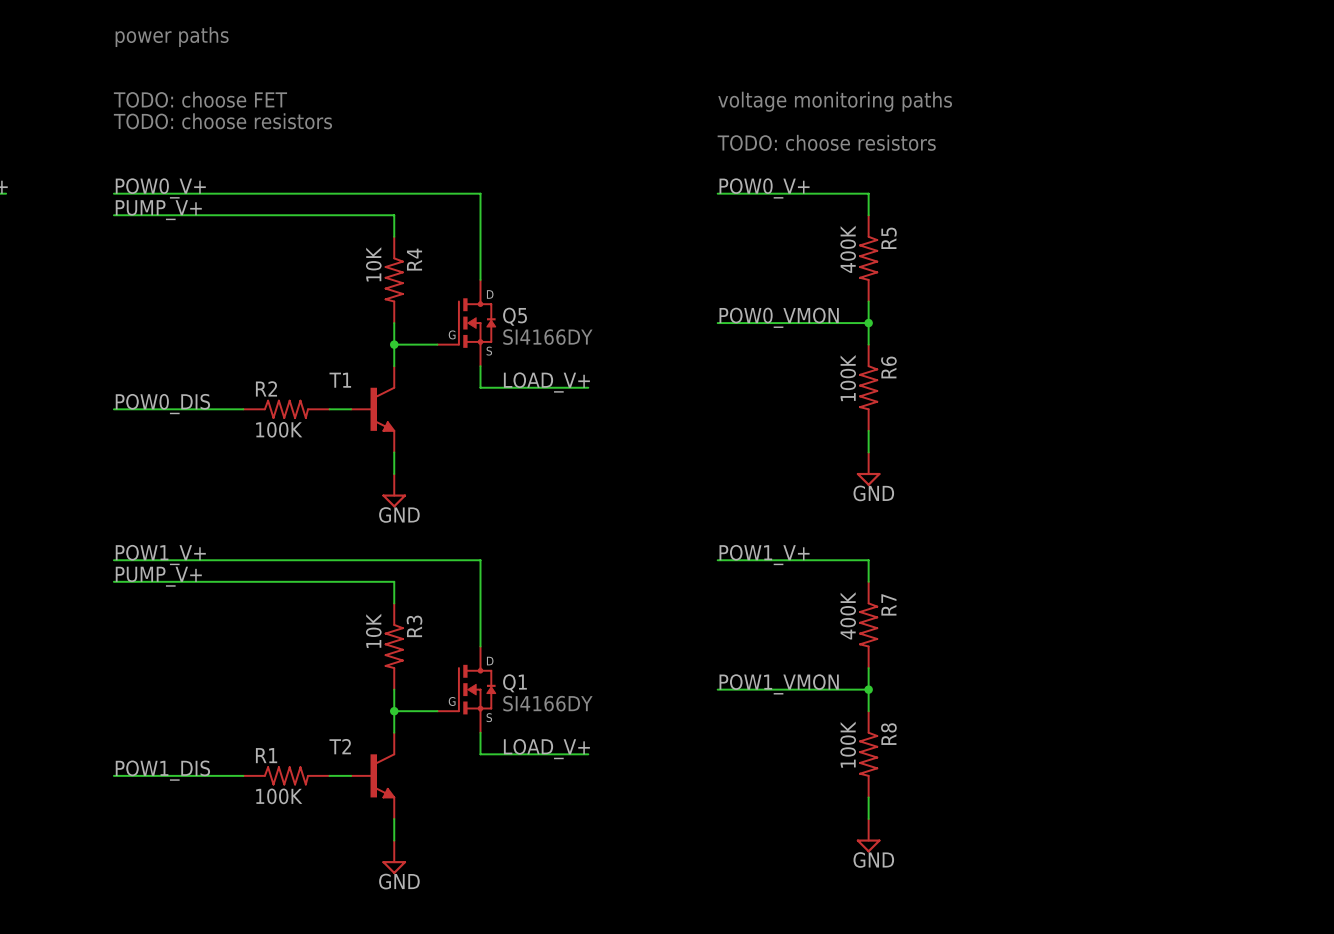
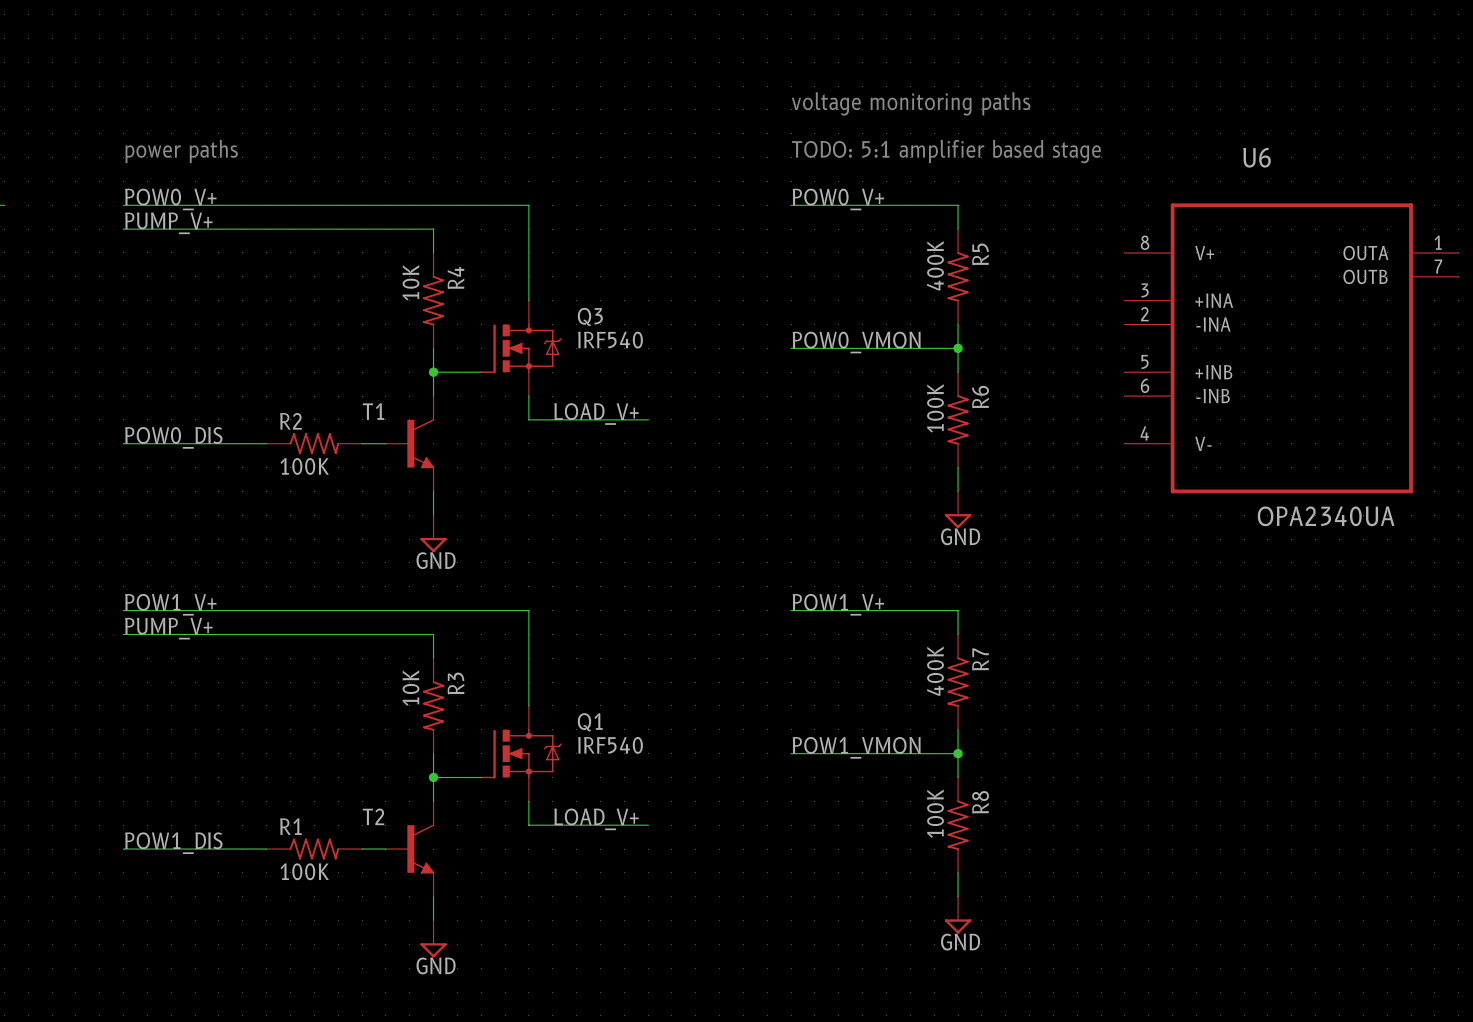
text position: power paths (172, 37) -> power paths (181, 151)
text: TODO: choose FET (200, 99) -> none
text: TODO: choose resistors (222, 121) -> none
text: TODO: choose resistors (826, 142) -> TODO: 5:1 amplifier based stage (946, 151)
Q5: (466, 323) -> none
Q3: none -> IRF540 (521, 348)
U6: none -> OPA2340UA (1291, 348)
text: SI4166DY (547, 337) -> none
Q1 symbol: [437, 646, 497, 733] -> [480, 705, 562, 802]
Q1 value: none -> IRF540 (610, 745)
Q1 name position: Q1 (514, 683) -> Q1 (590, 722)
text: SI4166DY (547, 703) -> none

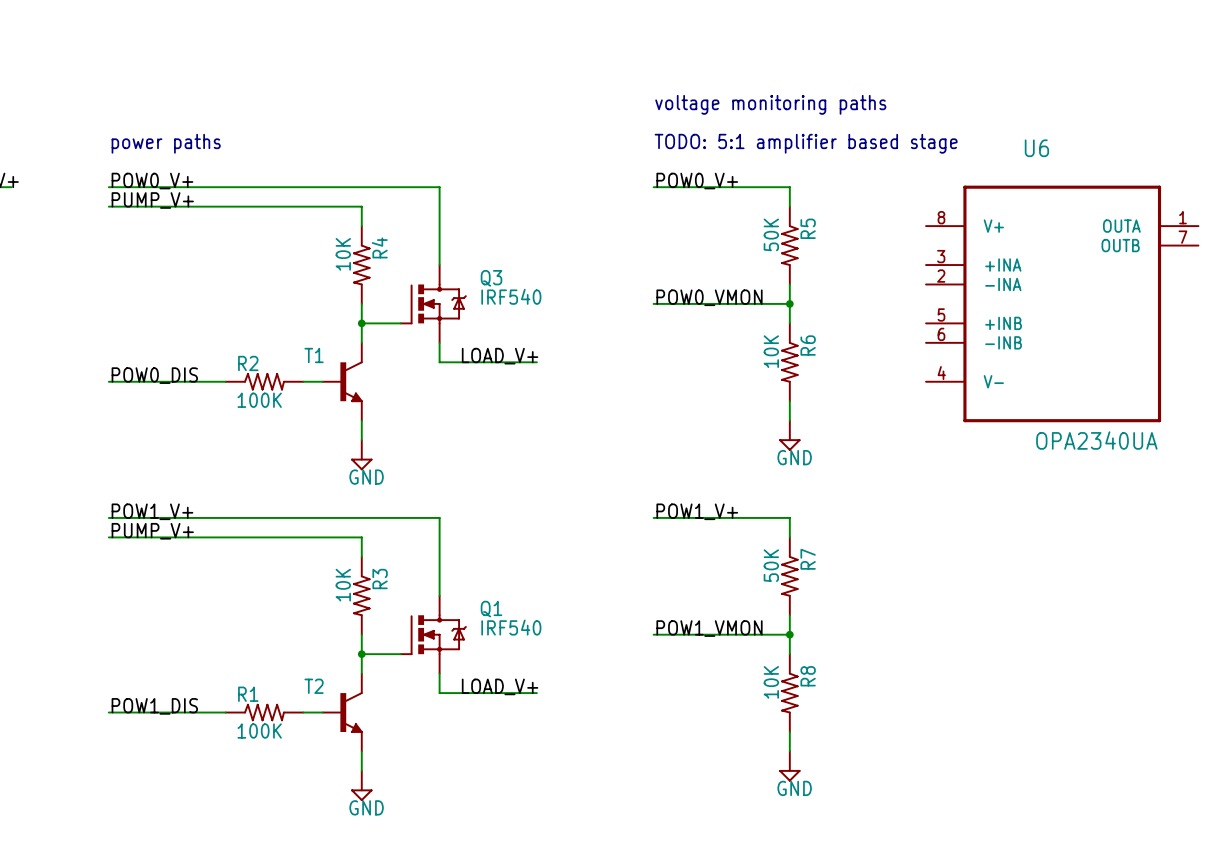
R5 value: 400K (935, 265) -> 50K (771, 234)
R6 value: 100K (935, 408) -> 10K (771, 351)
R7 value: 400K (935, 671) -> 50K (771, 565)
R8 value: 100K (935, 813) -> 10K (771, 682)

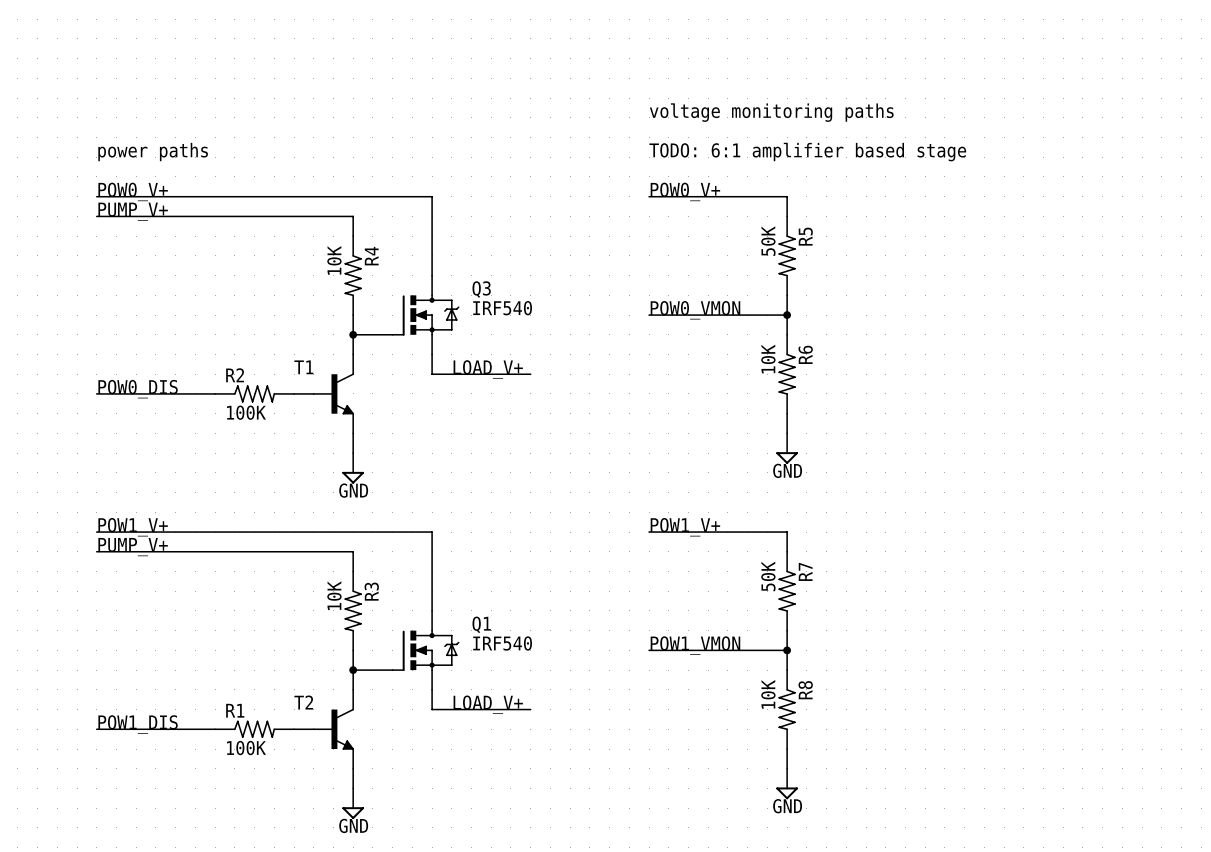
text: TODO: 5:1 amplifier based stage (806, 143) -> TODO: 6:1 amplifier based stage (807, 152)
U6: OPA2340UA (1062, 303) -> none

